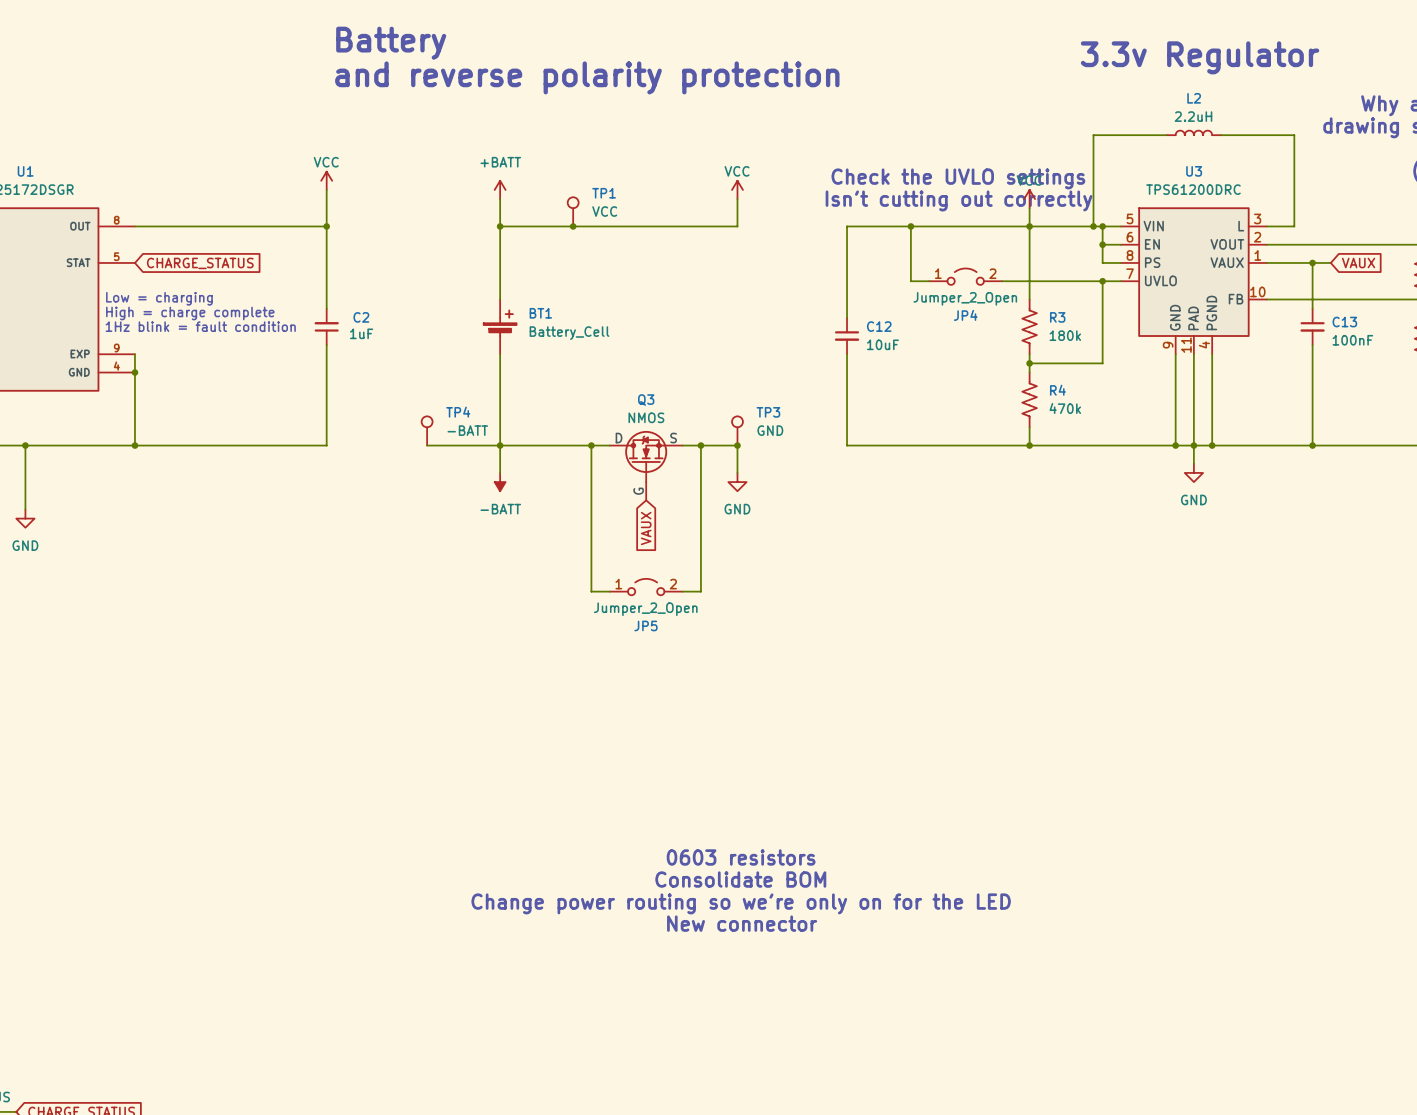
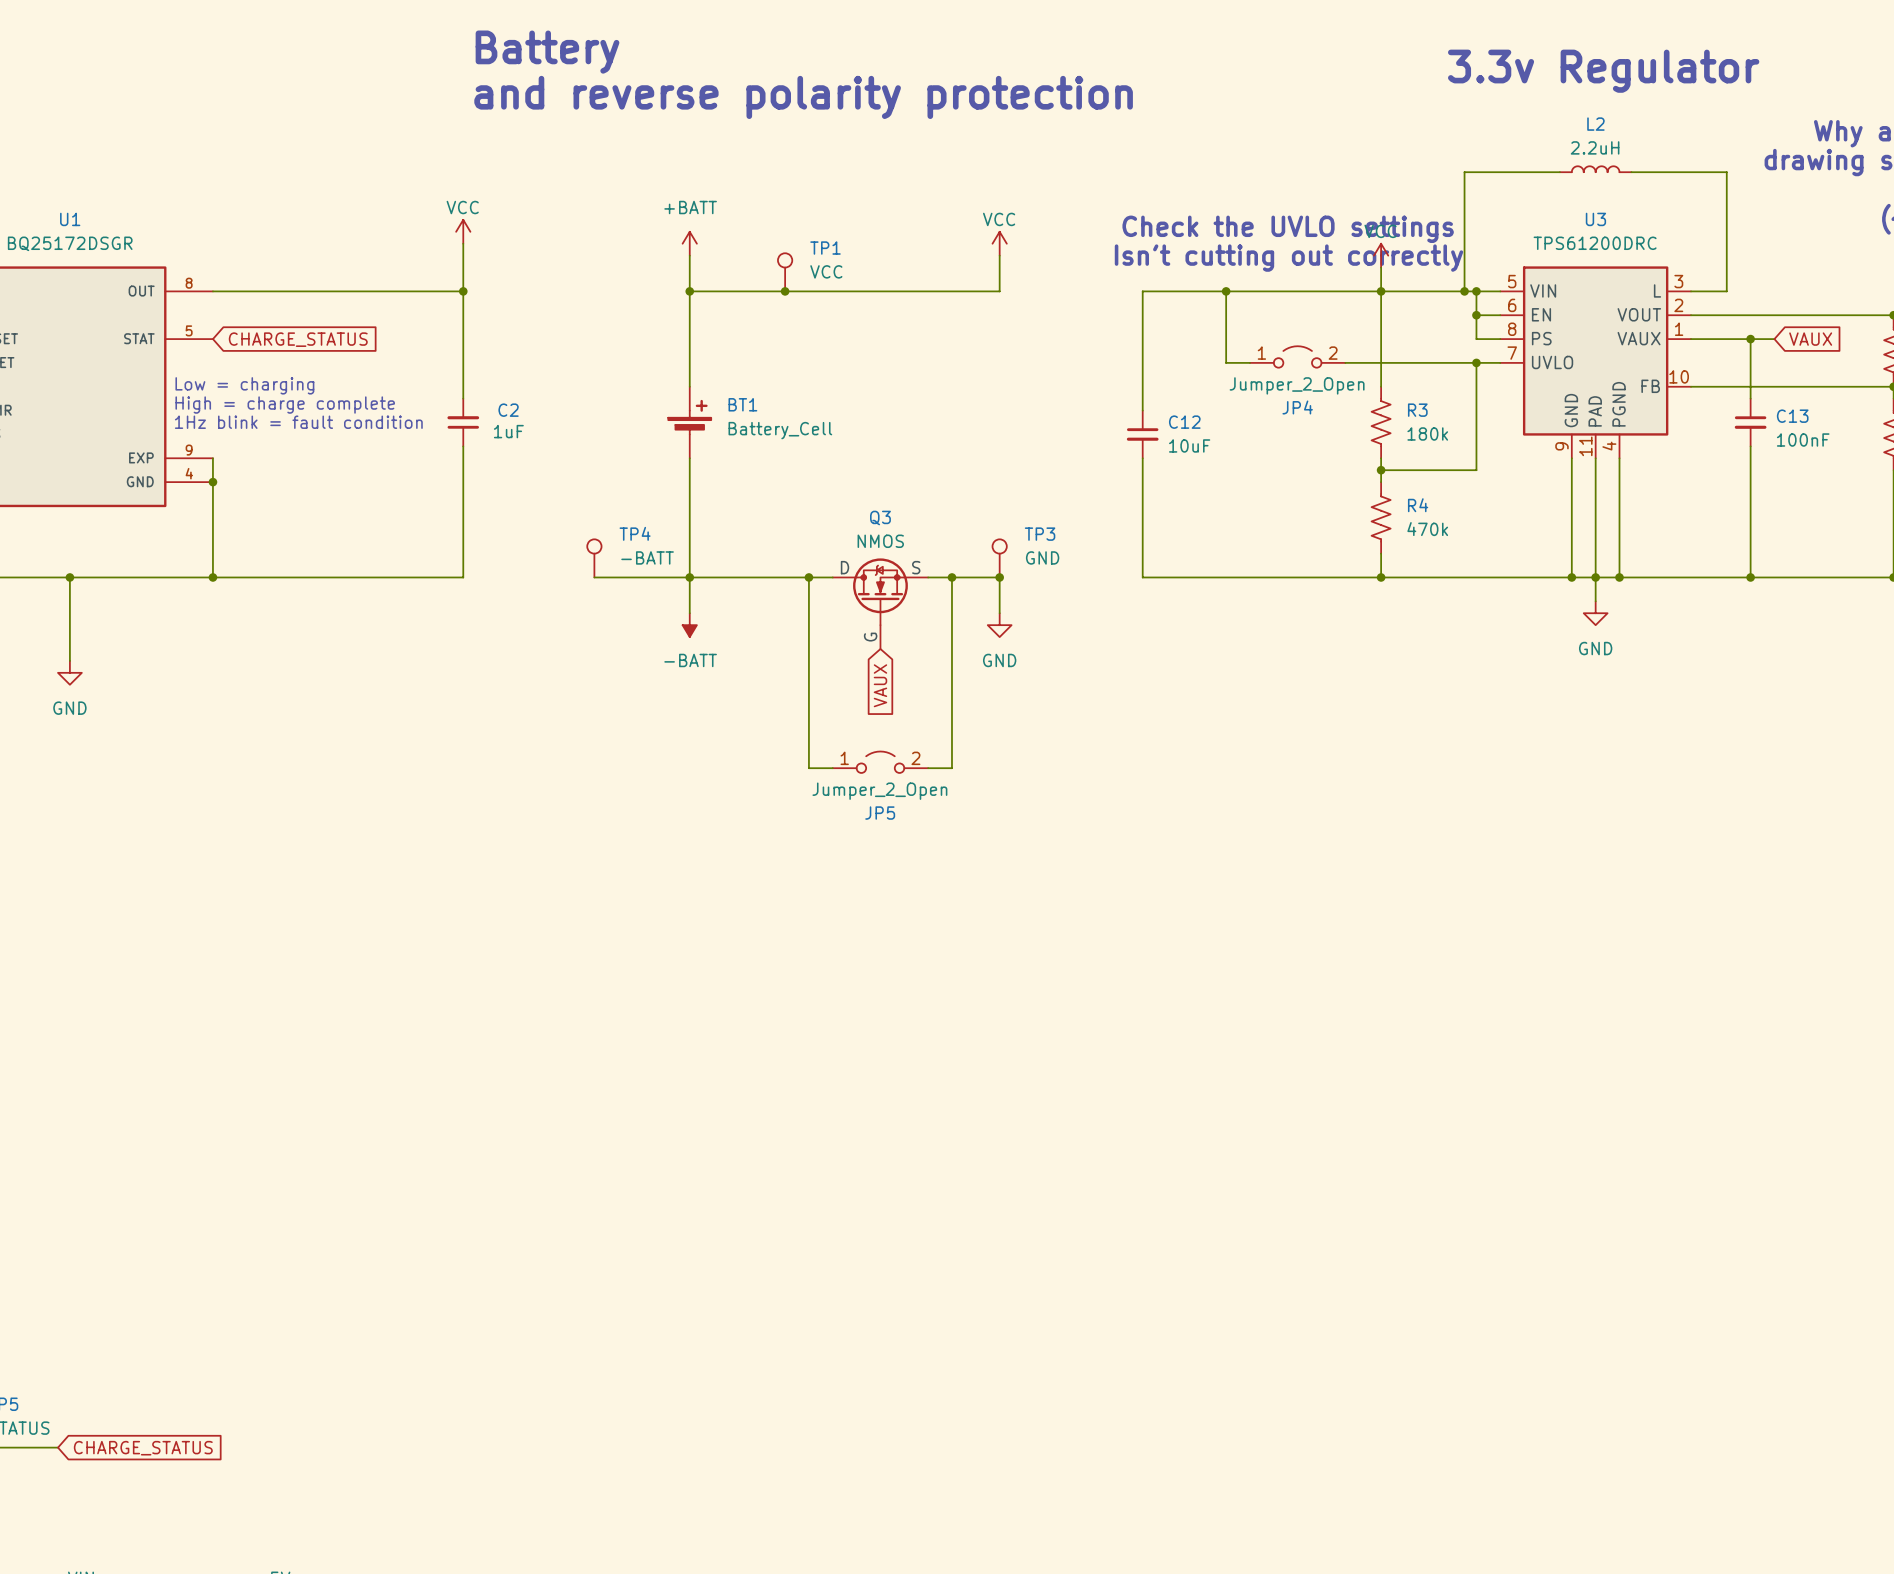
text: 0603 resistors (741, 857) -> none
text: Consolidate BOM (740, 879) -> none
text: Change power routing so we're only on for the LED (741, 903) -> none
text: New connector (742, 923) -> none

